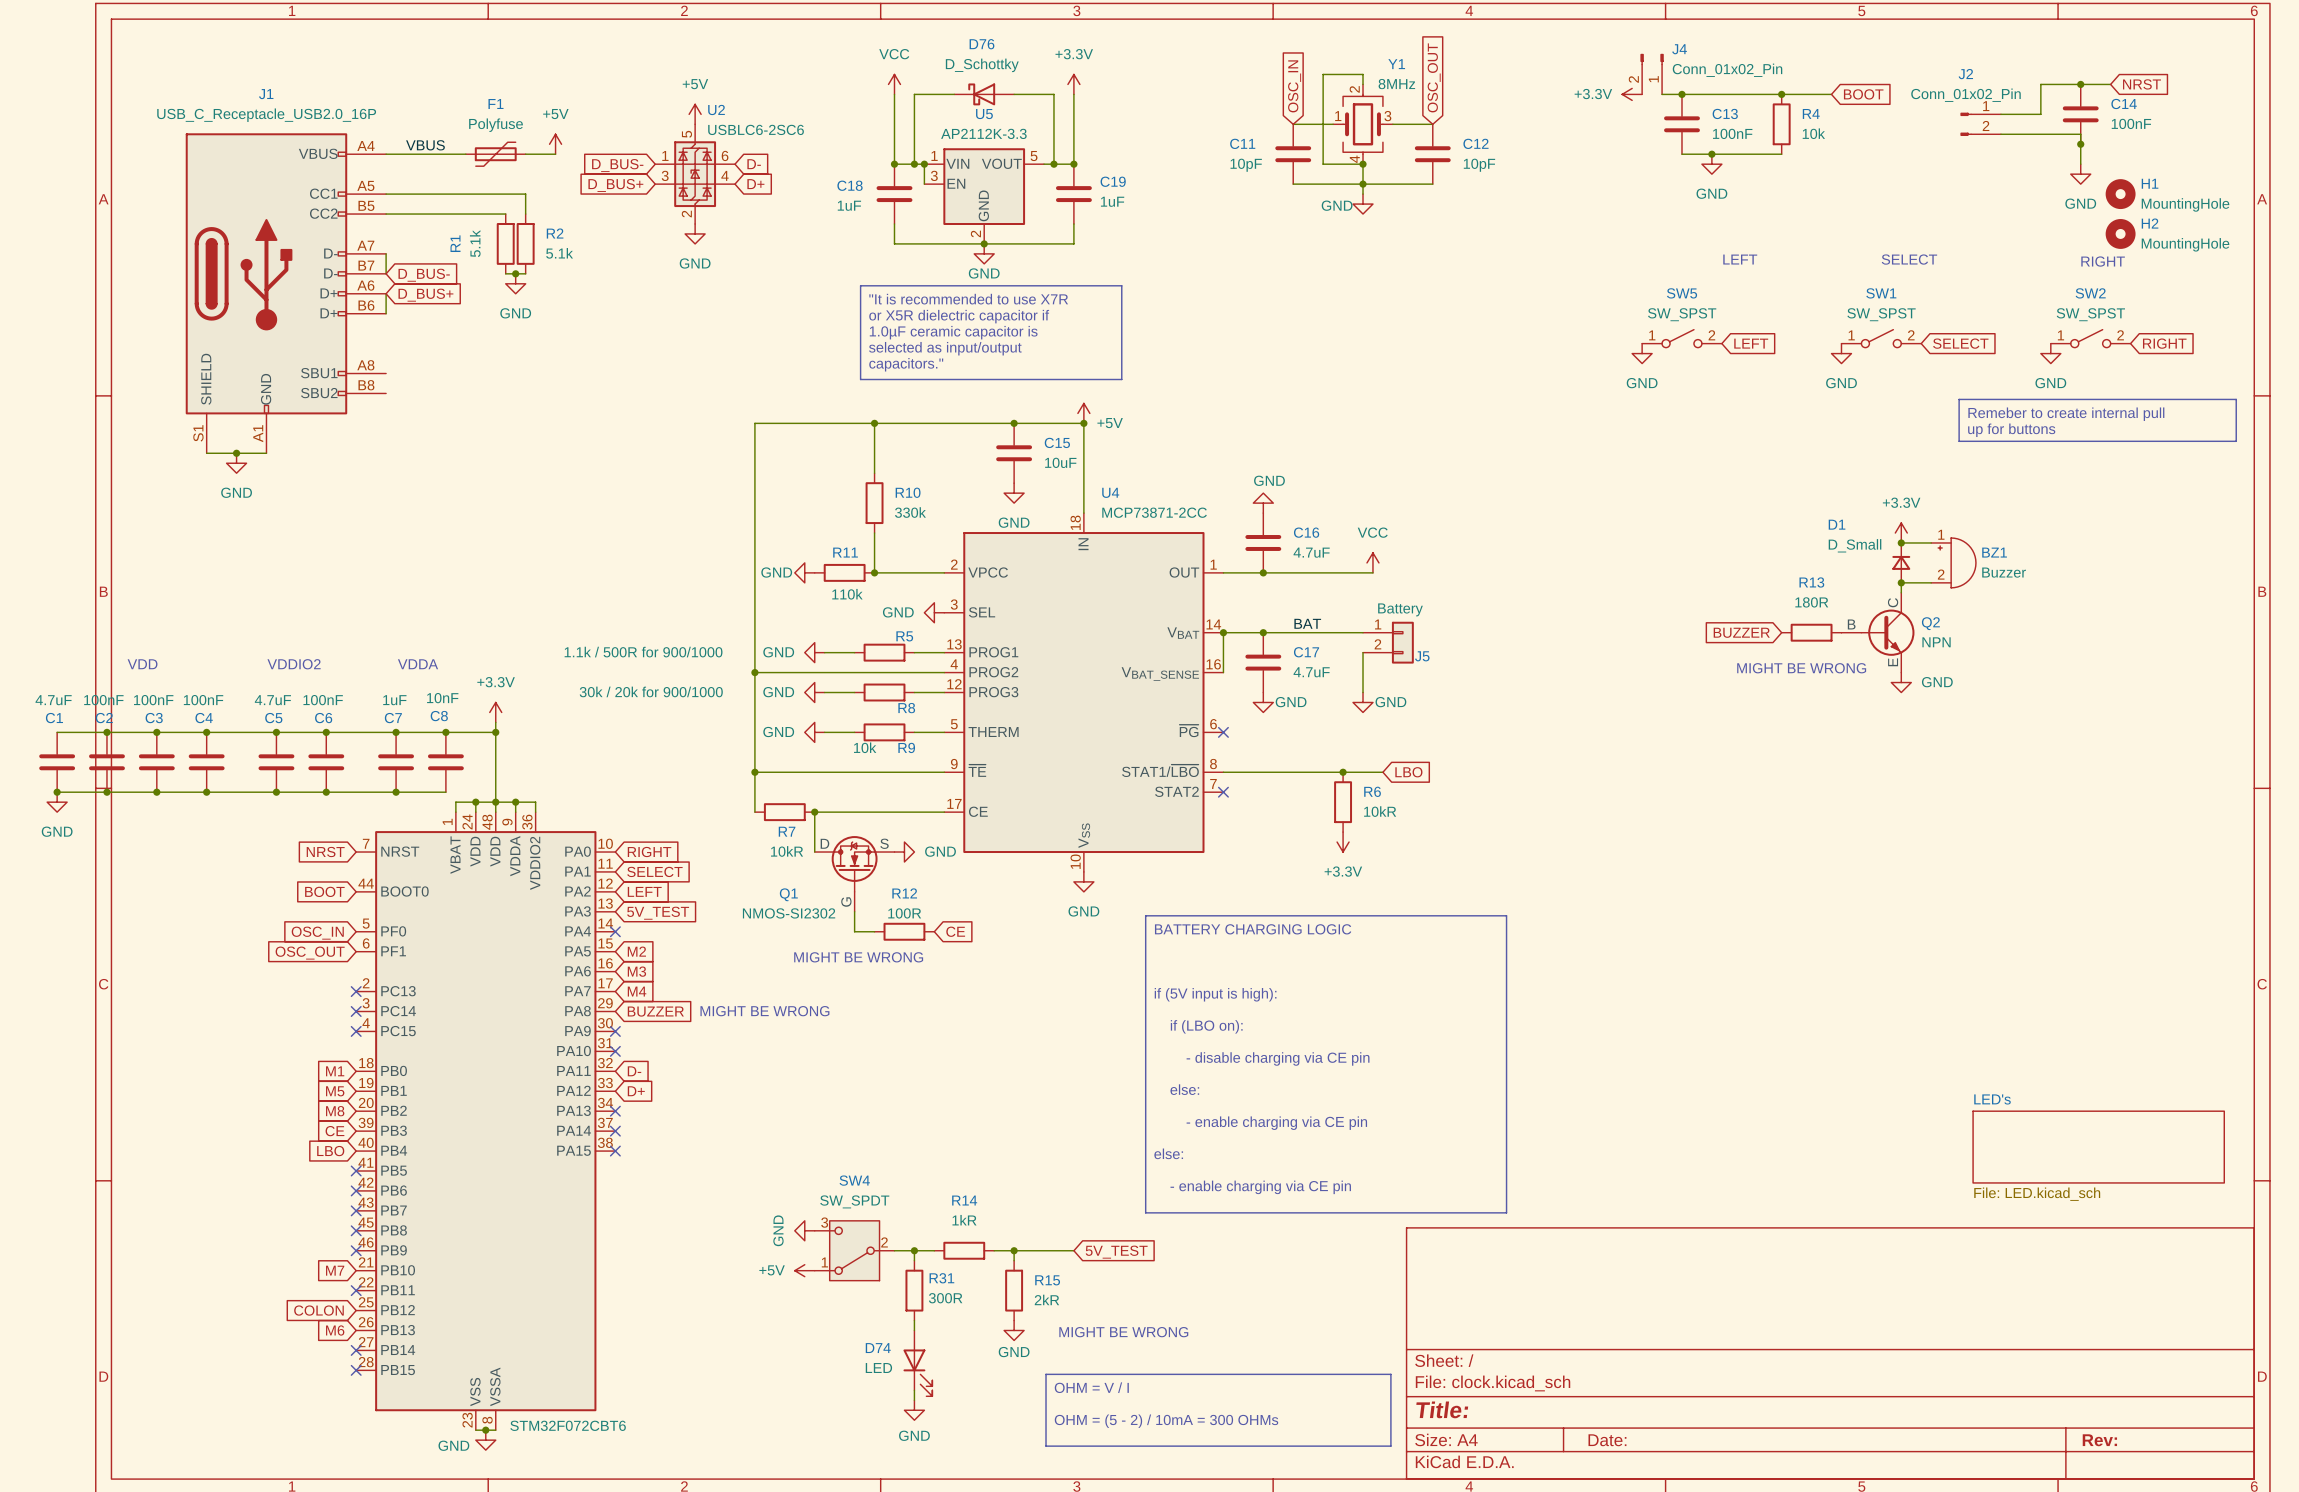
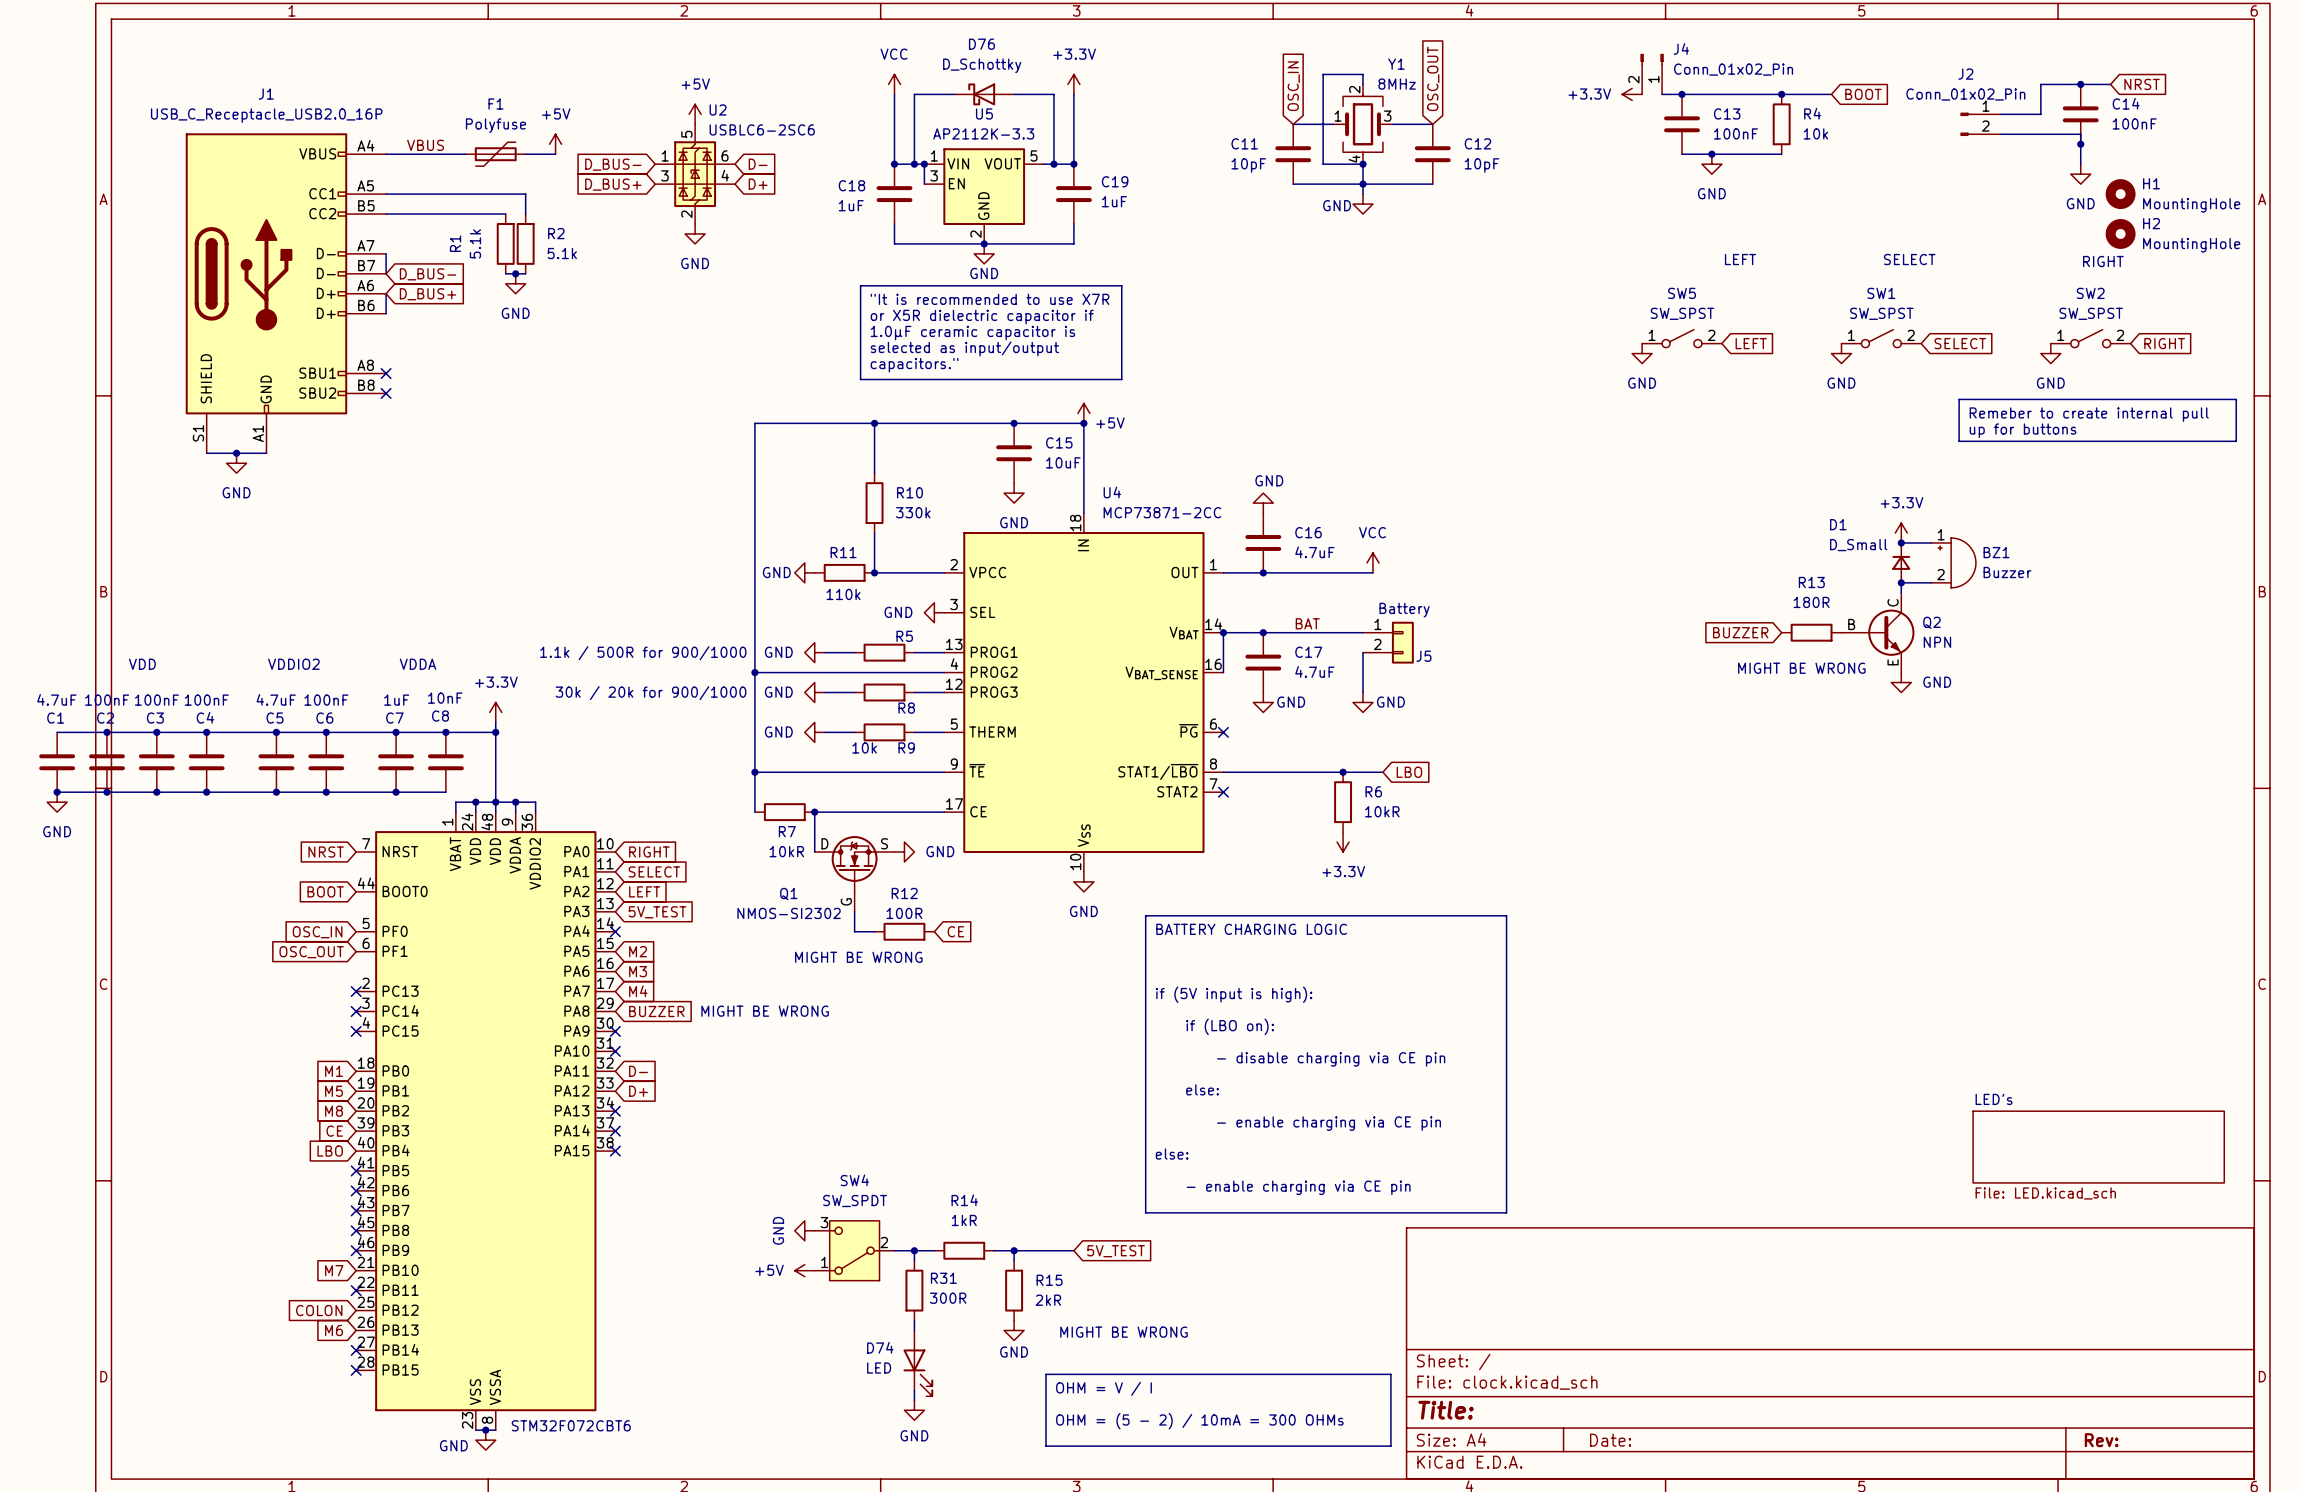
no-connect mark: none -> (386, 373)
no-connect mark: none -> (386, 393)

